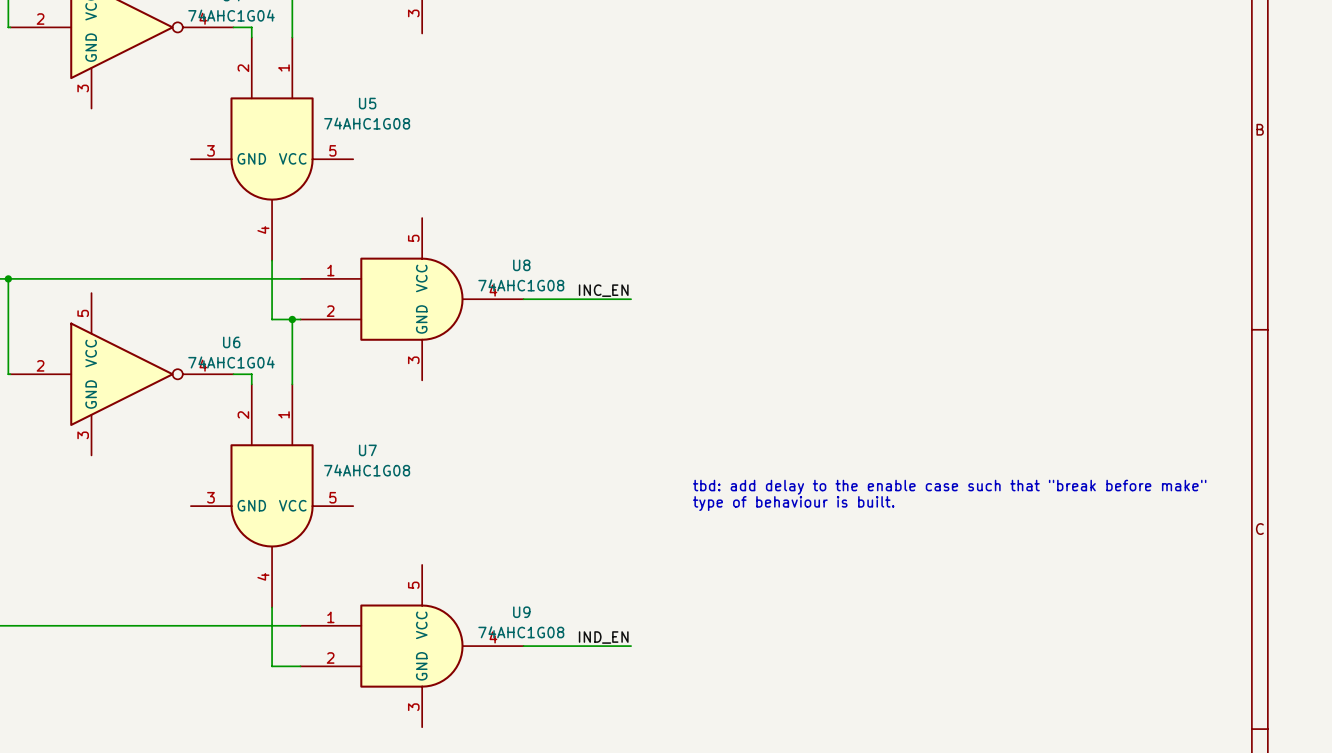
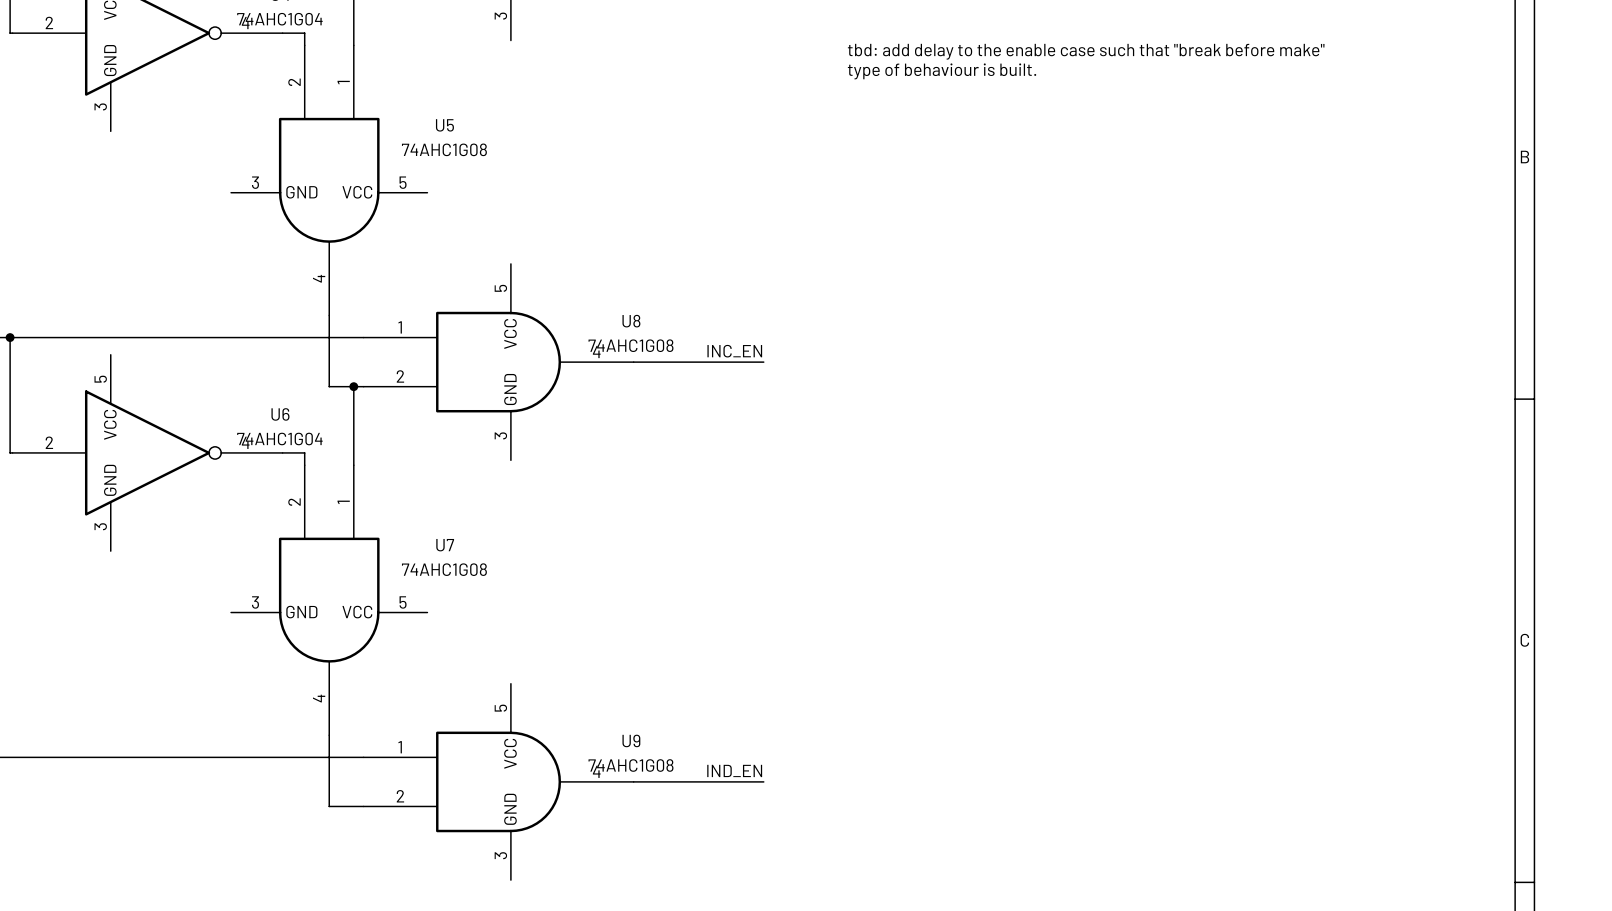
text: none -> tbd: add delay to the enable case such that "break before make" (1086, 51)
text: none -> type of behaviour is built. (942, 71)
text: tbd: add delay to the enable case such that "break before make" (949, 487) -> none
text: type of behaviour is built. (793, 503) -> none

